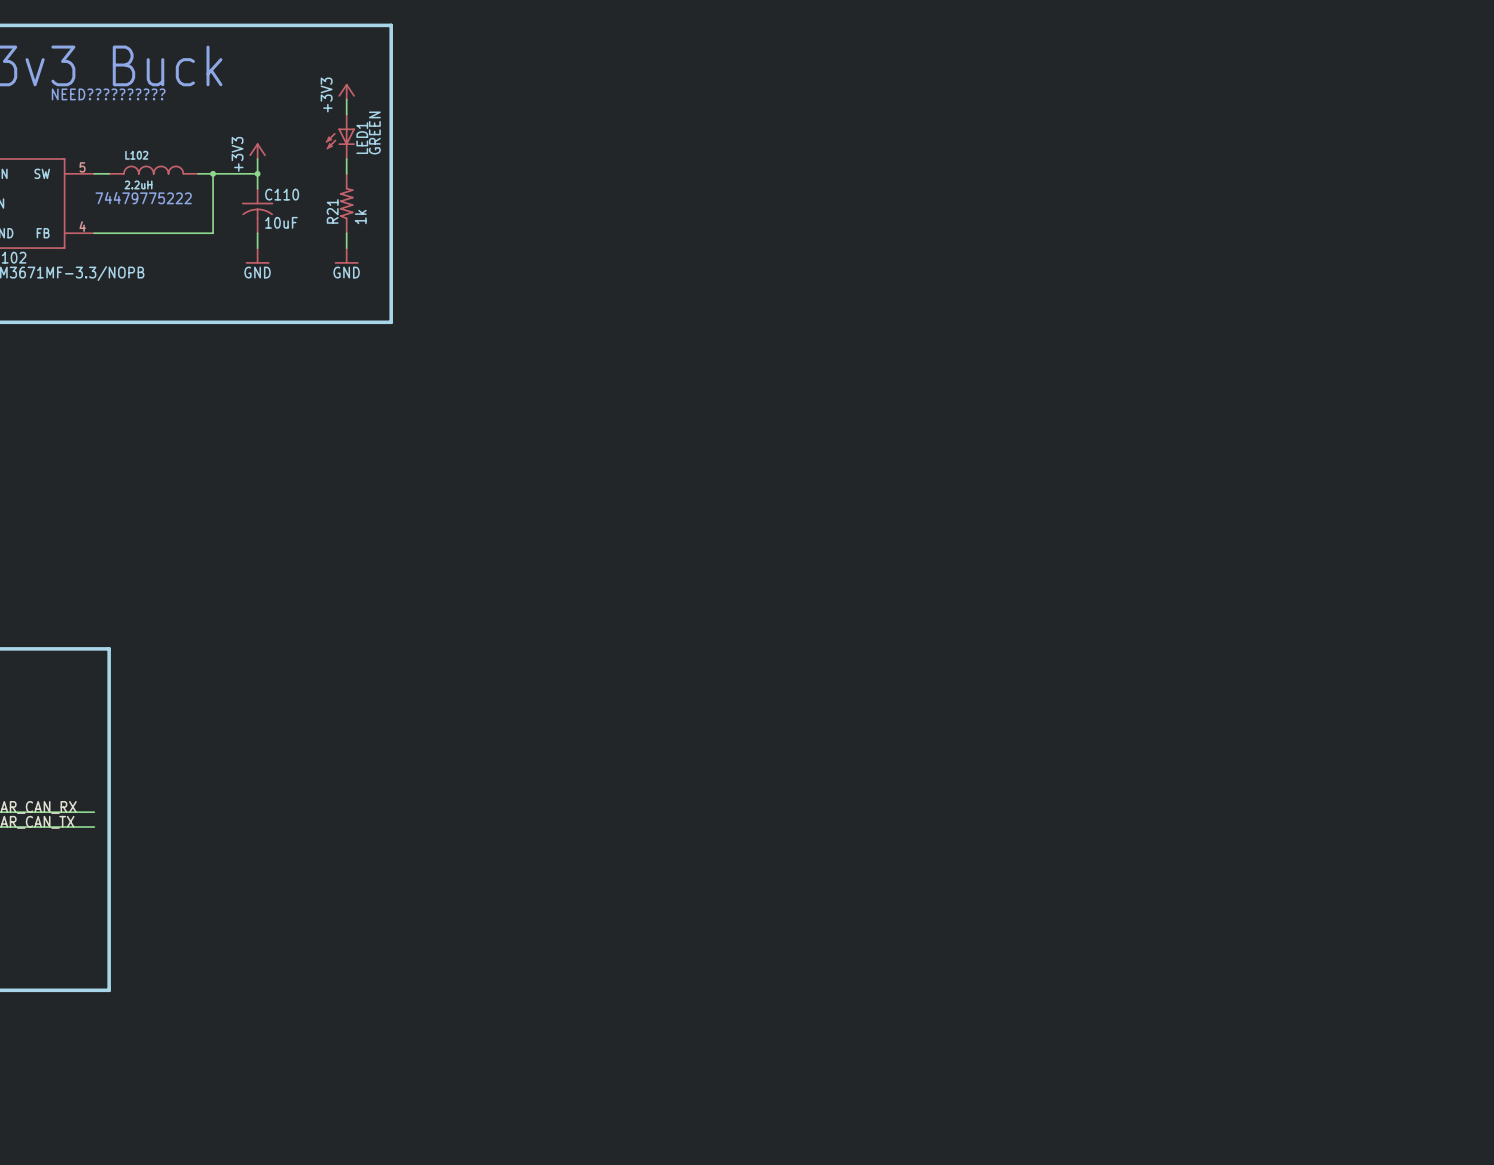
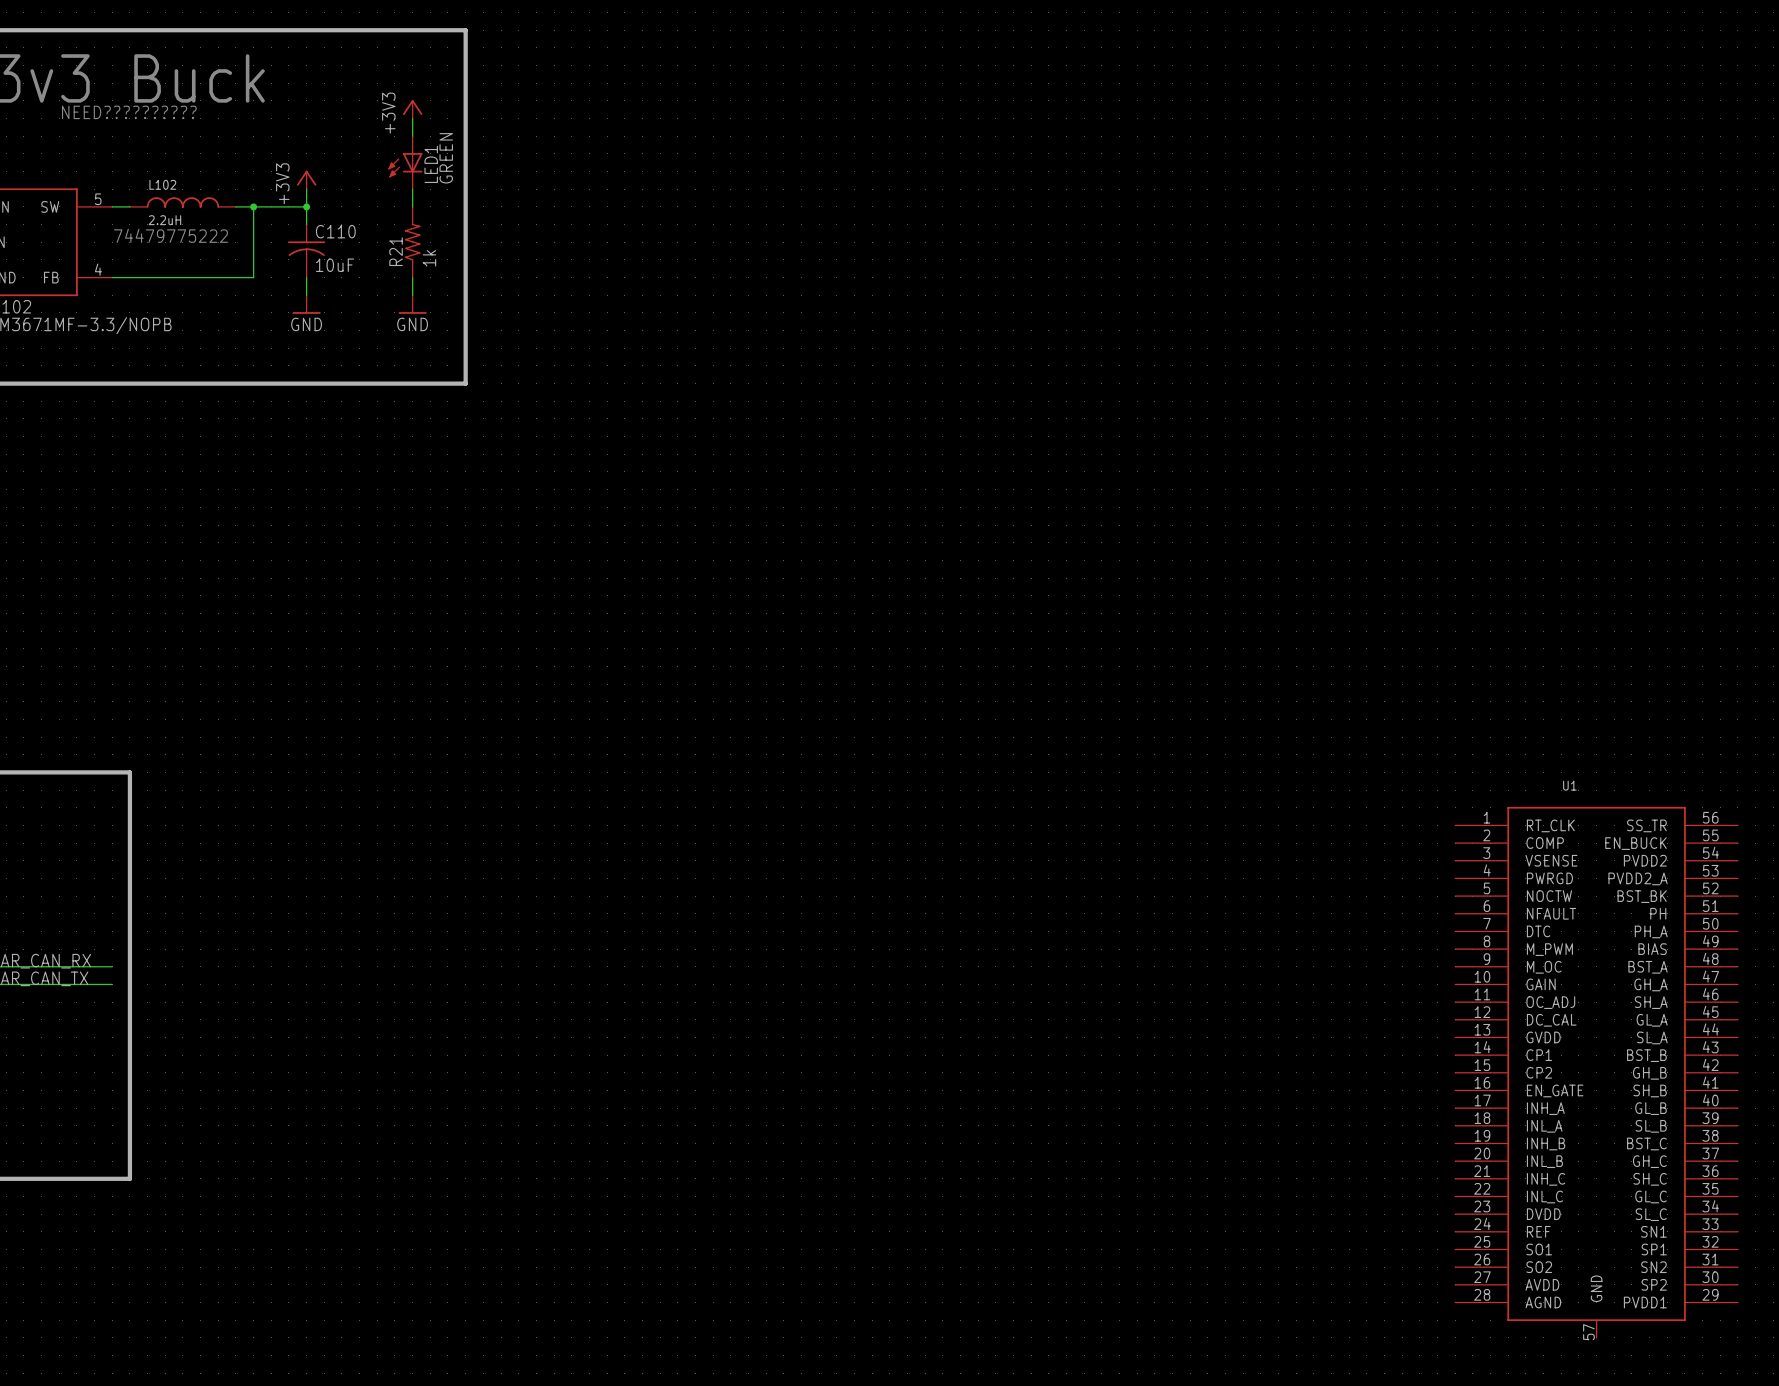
U1: none -> (1596, 1072)

